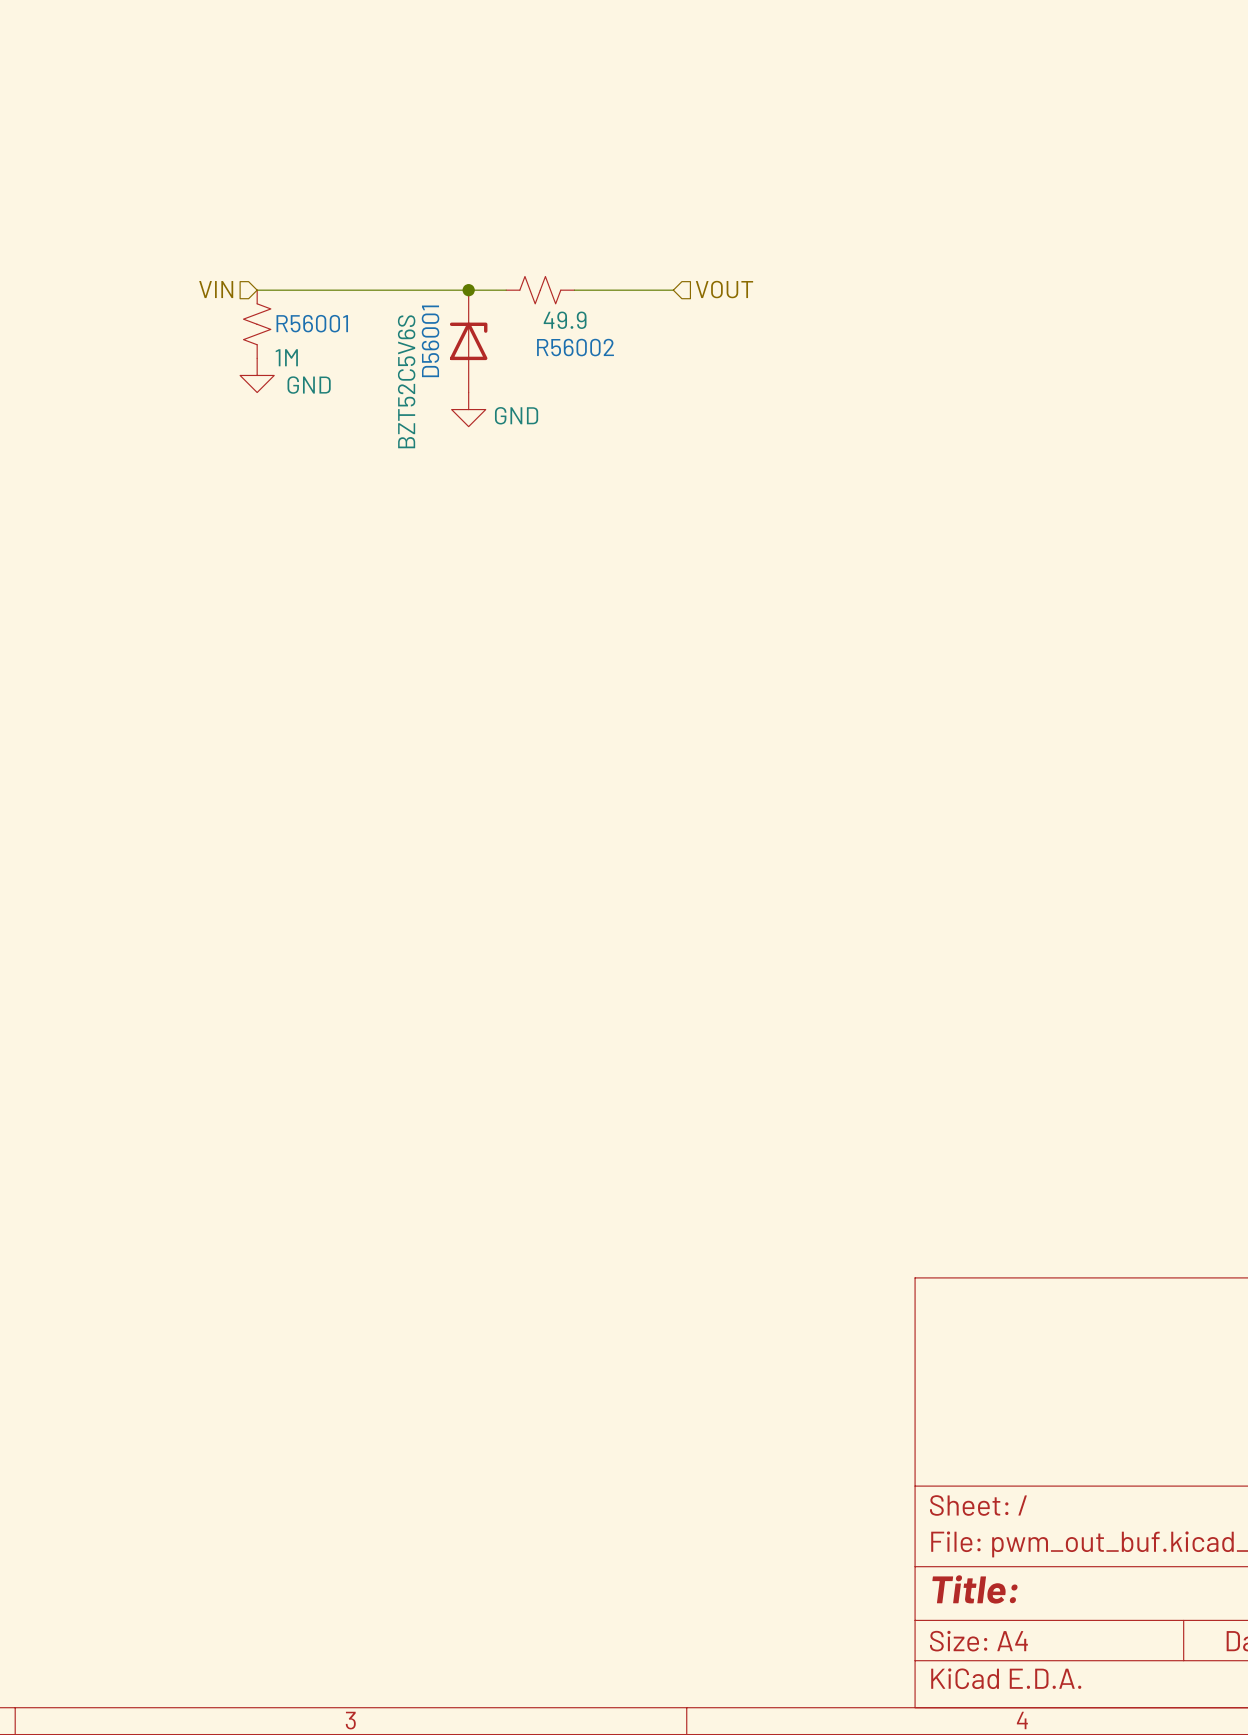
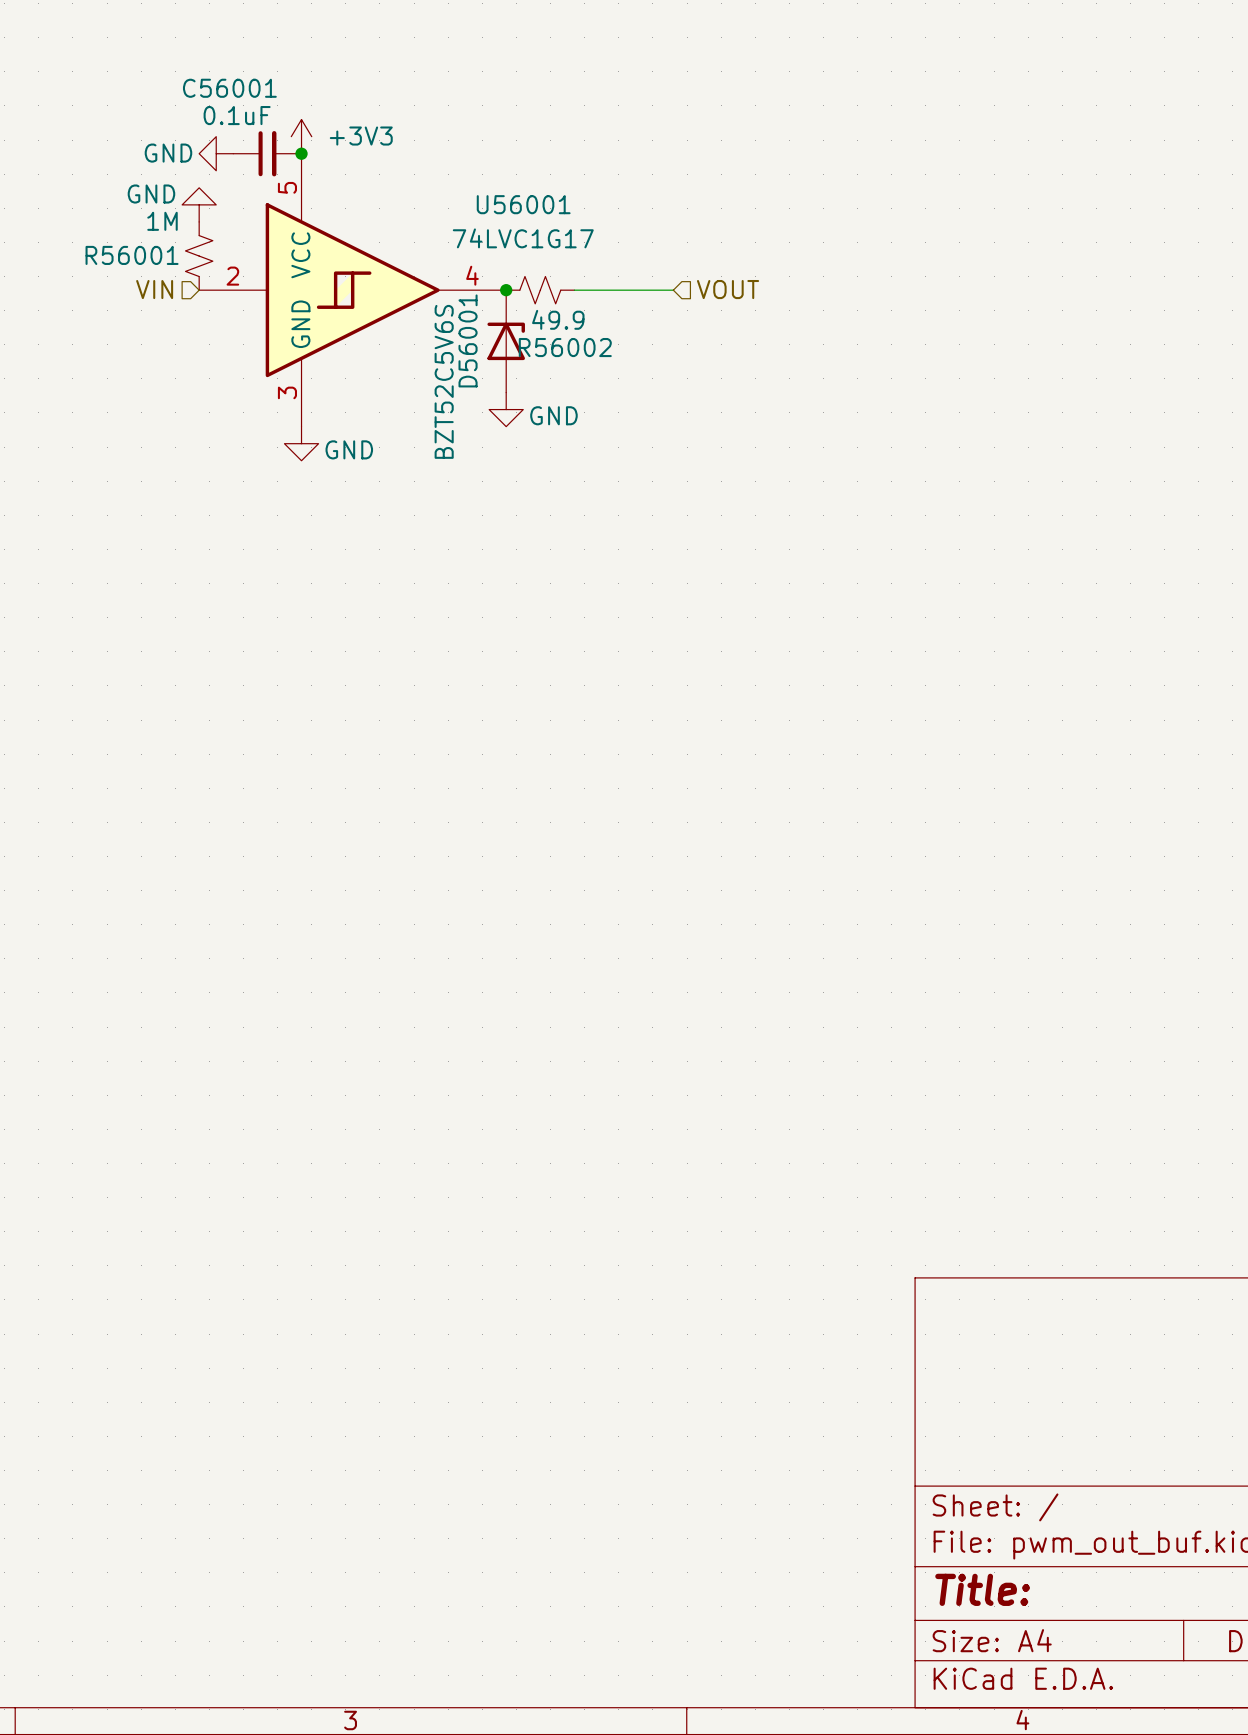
power symbol: none -> +3V3 (301, 136)
power symbol: none -> GND (216, 153)
C56001: none -> 0.1uF (267, 153)
junction: none -> (301, 153)
power symbol: none -> GND (199, 204)
hierarchical label position: VIN (216, 289) -> VIN (154, 289)
U56001: none -> 74LVC1G17 (352, 290)
junction position: (468, 290) -> (506, 290)
R56001 name position: R56001 (312, 323) -> R56001 (132, 255)
R56001 position: (257, 324) -> (199, 256)
D56001 position: (468, 341) -> (506, 341)
R56001 value position: 1M (286, 357) -> 1M (162, 221)
power symbol position: GND (257, 375) -> GND (301, 443)
power symbol text position: GND (309, 385) -> GND (349, 449)
power symbol position: GND (468, 409) -> GND (506, 409)

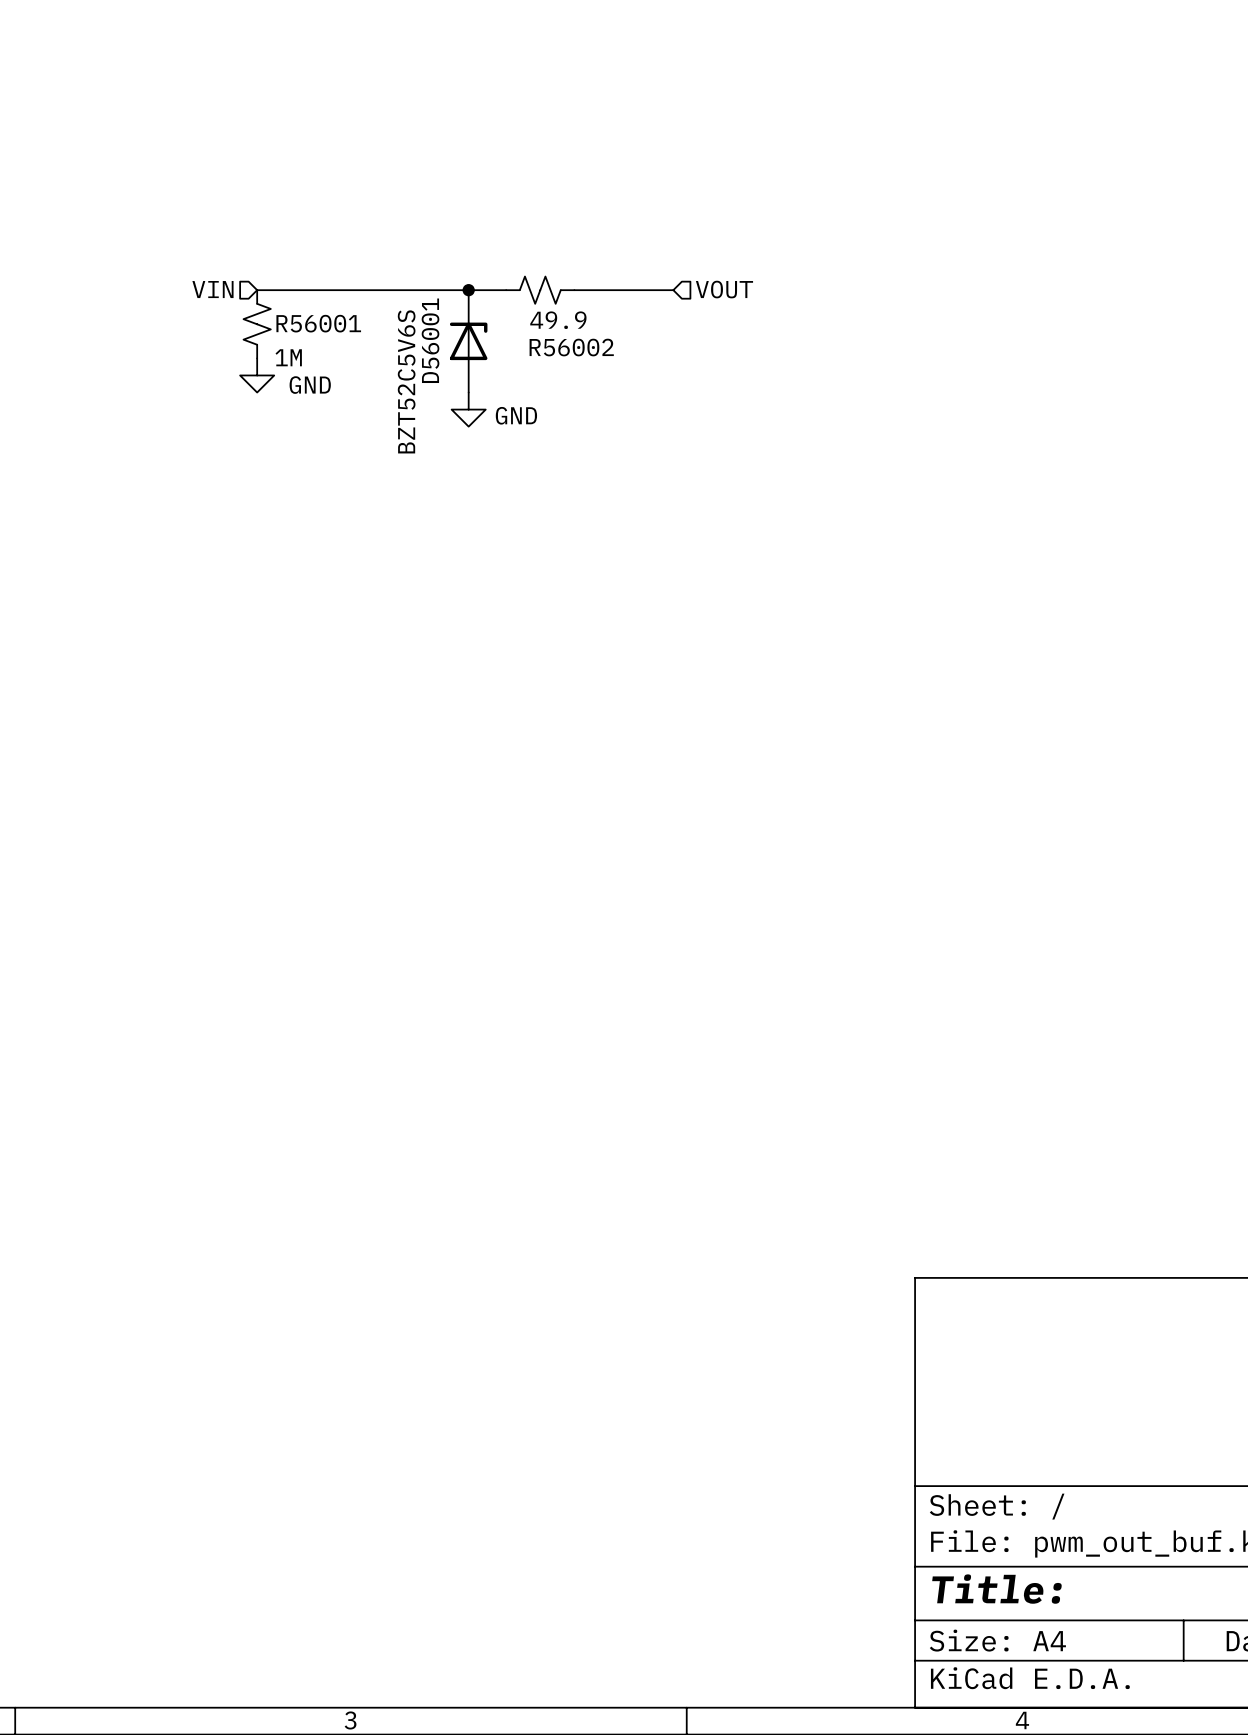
power symbol: +3V3 (301, 136) -> none
power symbol: GND (216, 153) -> none
C56001: 0.1uF (267, 153) -> none
junction: (301, 153) -> none
power symbol: GND (199, 204) -> none
R56001 value position: 1M (162, 221) -> 1M (288, 357)
R56001 name position: R56001 (132, 255) -> R56001 (318, 323)
R56001 position: (199, 256) -> (257, 324)
hierarchical label position: VIN (154, 289) -> VIN (212, 289)
U56001: 74LVC1G17 (352, 290) -> none
junction position: (506, 290) -> (468, 290)
D56001 position: (506, 341) -> (468, 341)
power symbol position: GND (506, 409) -> GND (468, 409)
power symbol position: GND (301, 443) -> GND (257, 375)
power symbol text position: GND (349, 449) -> GND (310, 385)

